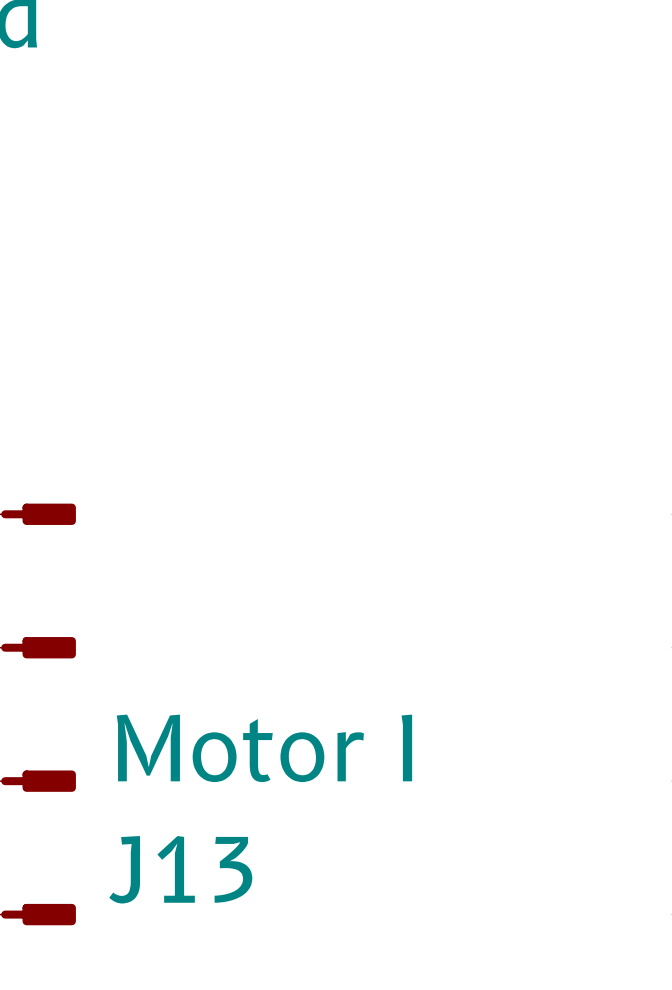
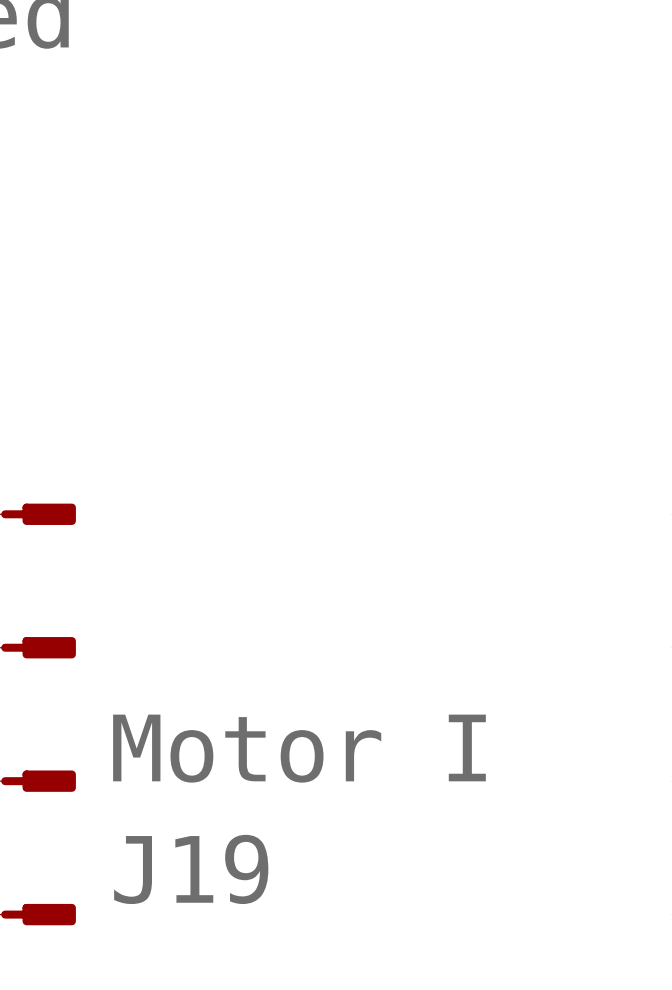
J13 name: J13 (180, 869) -> J19 (191, 869)

